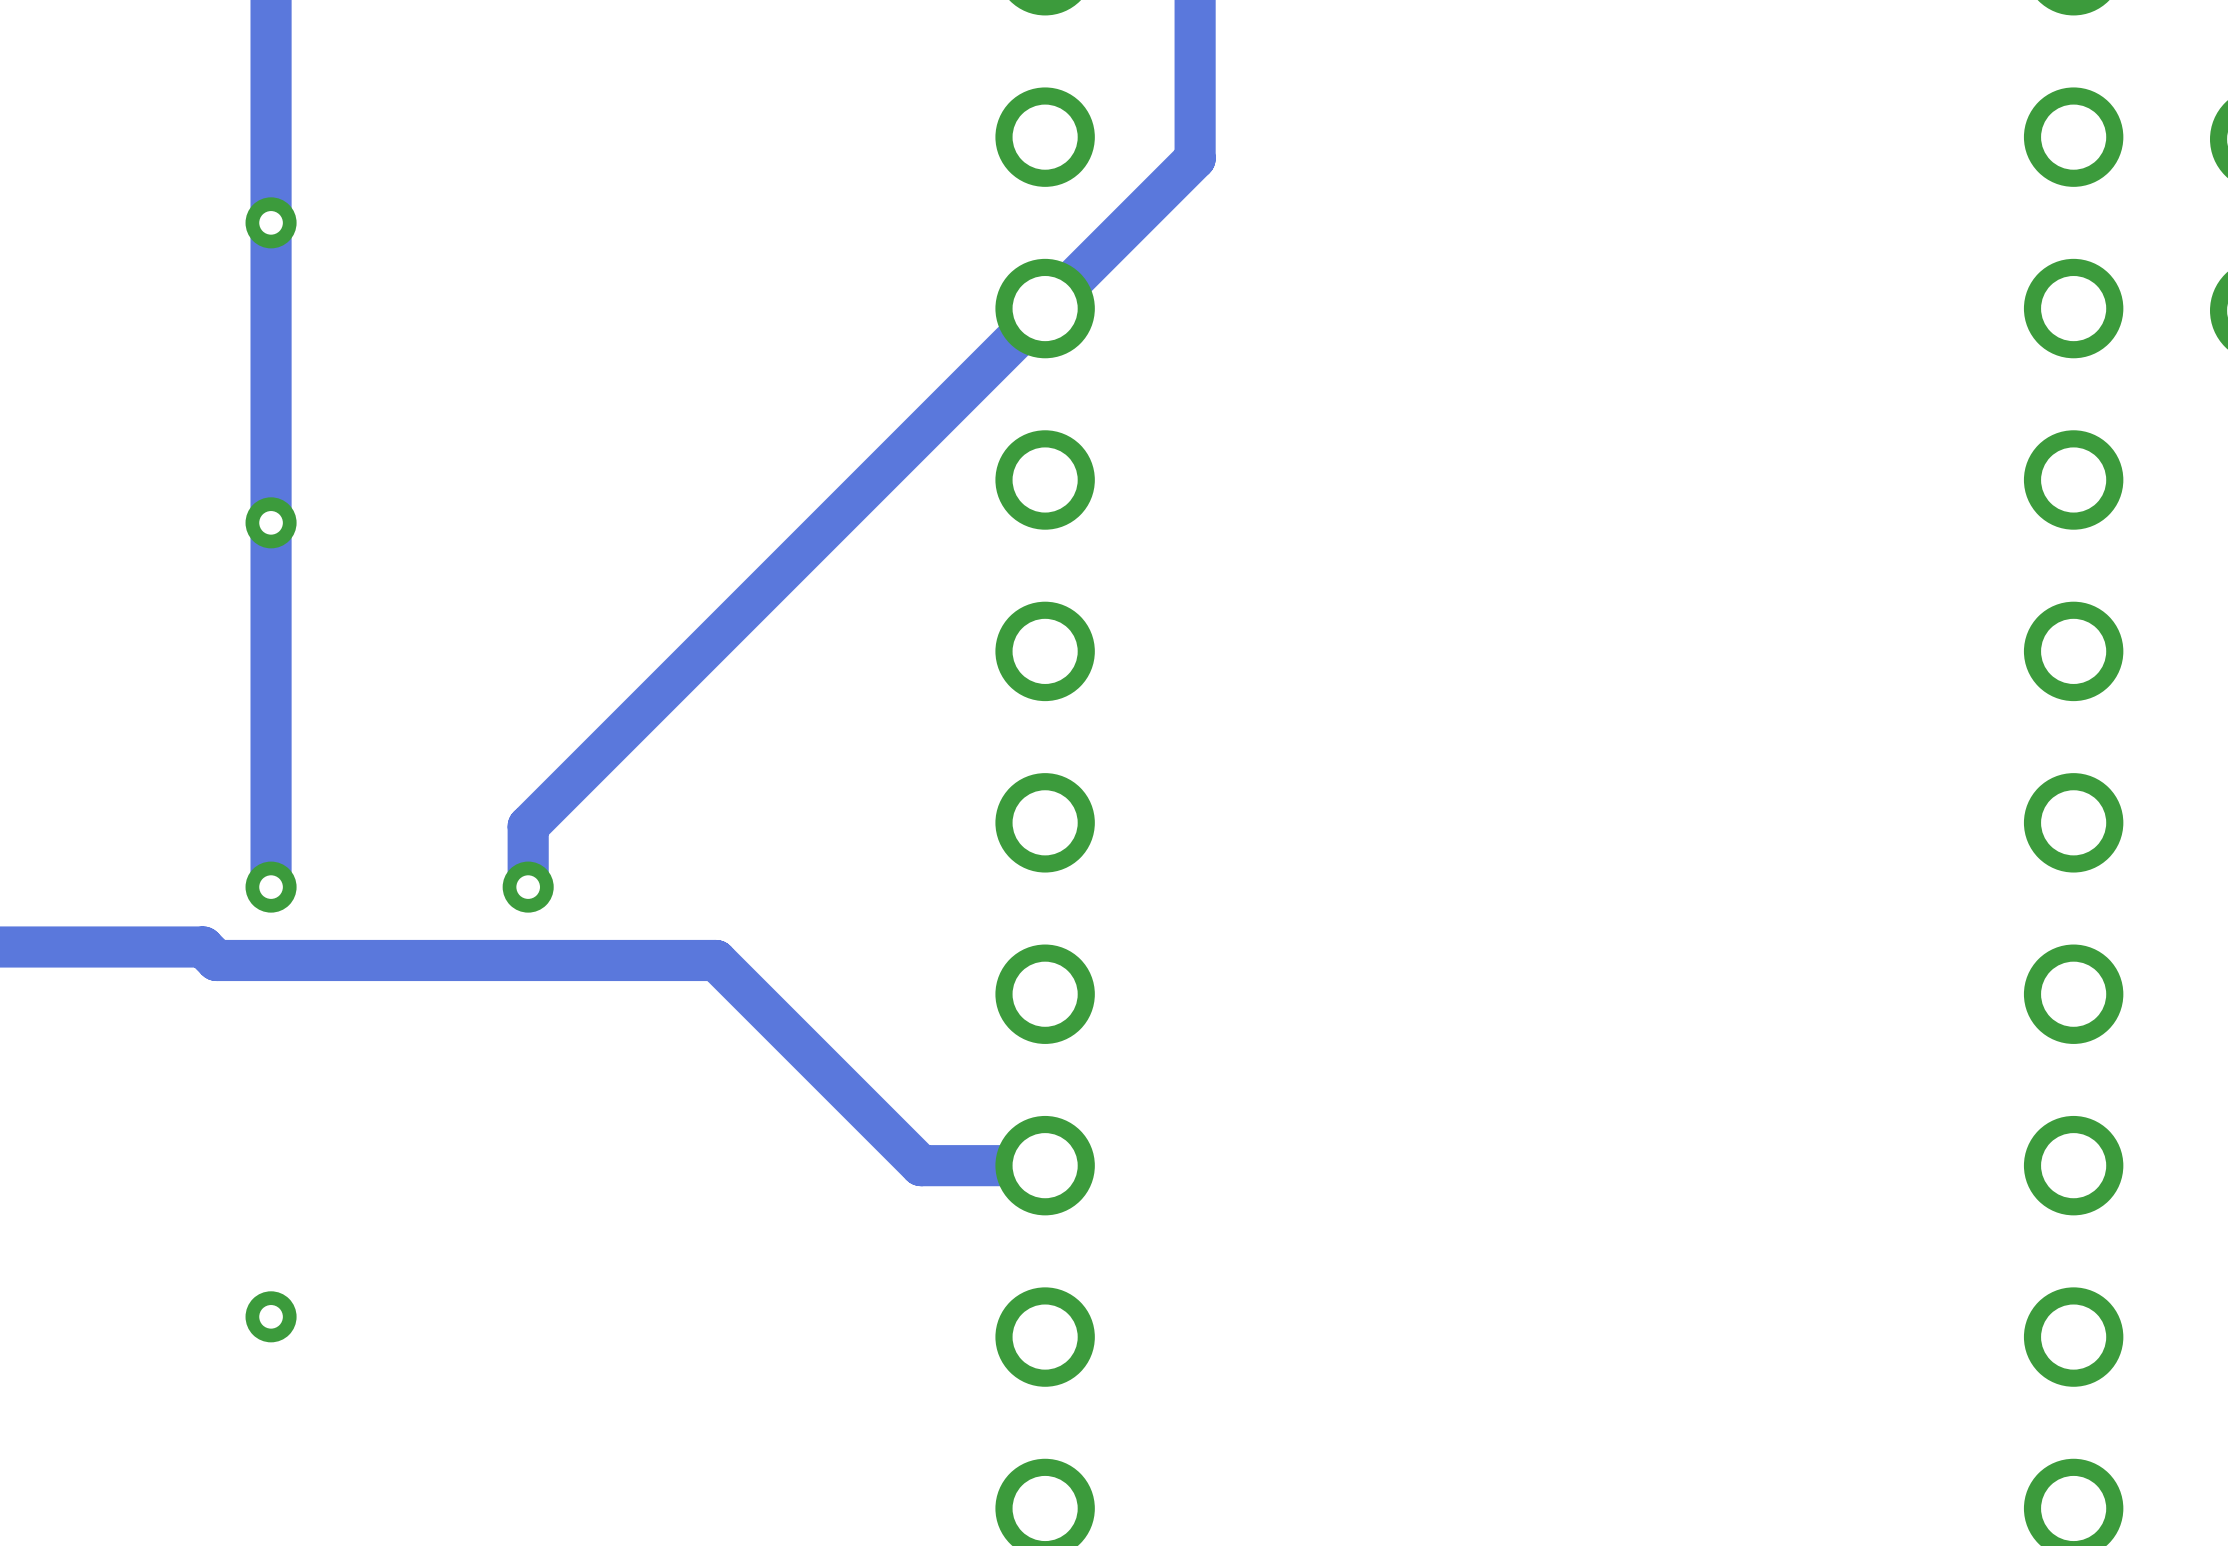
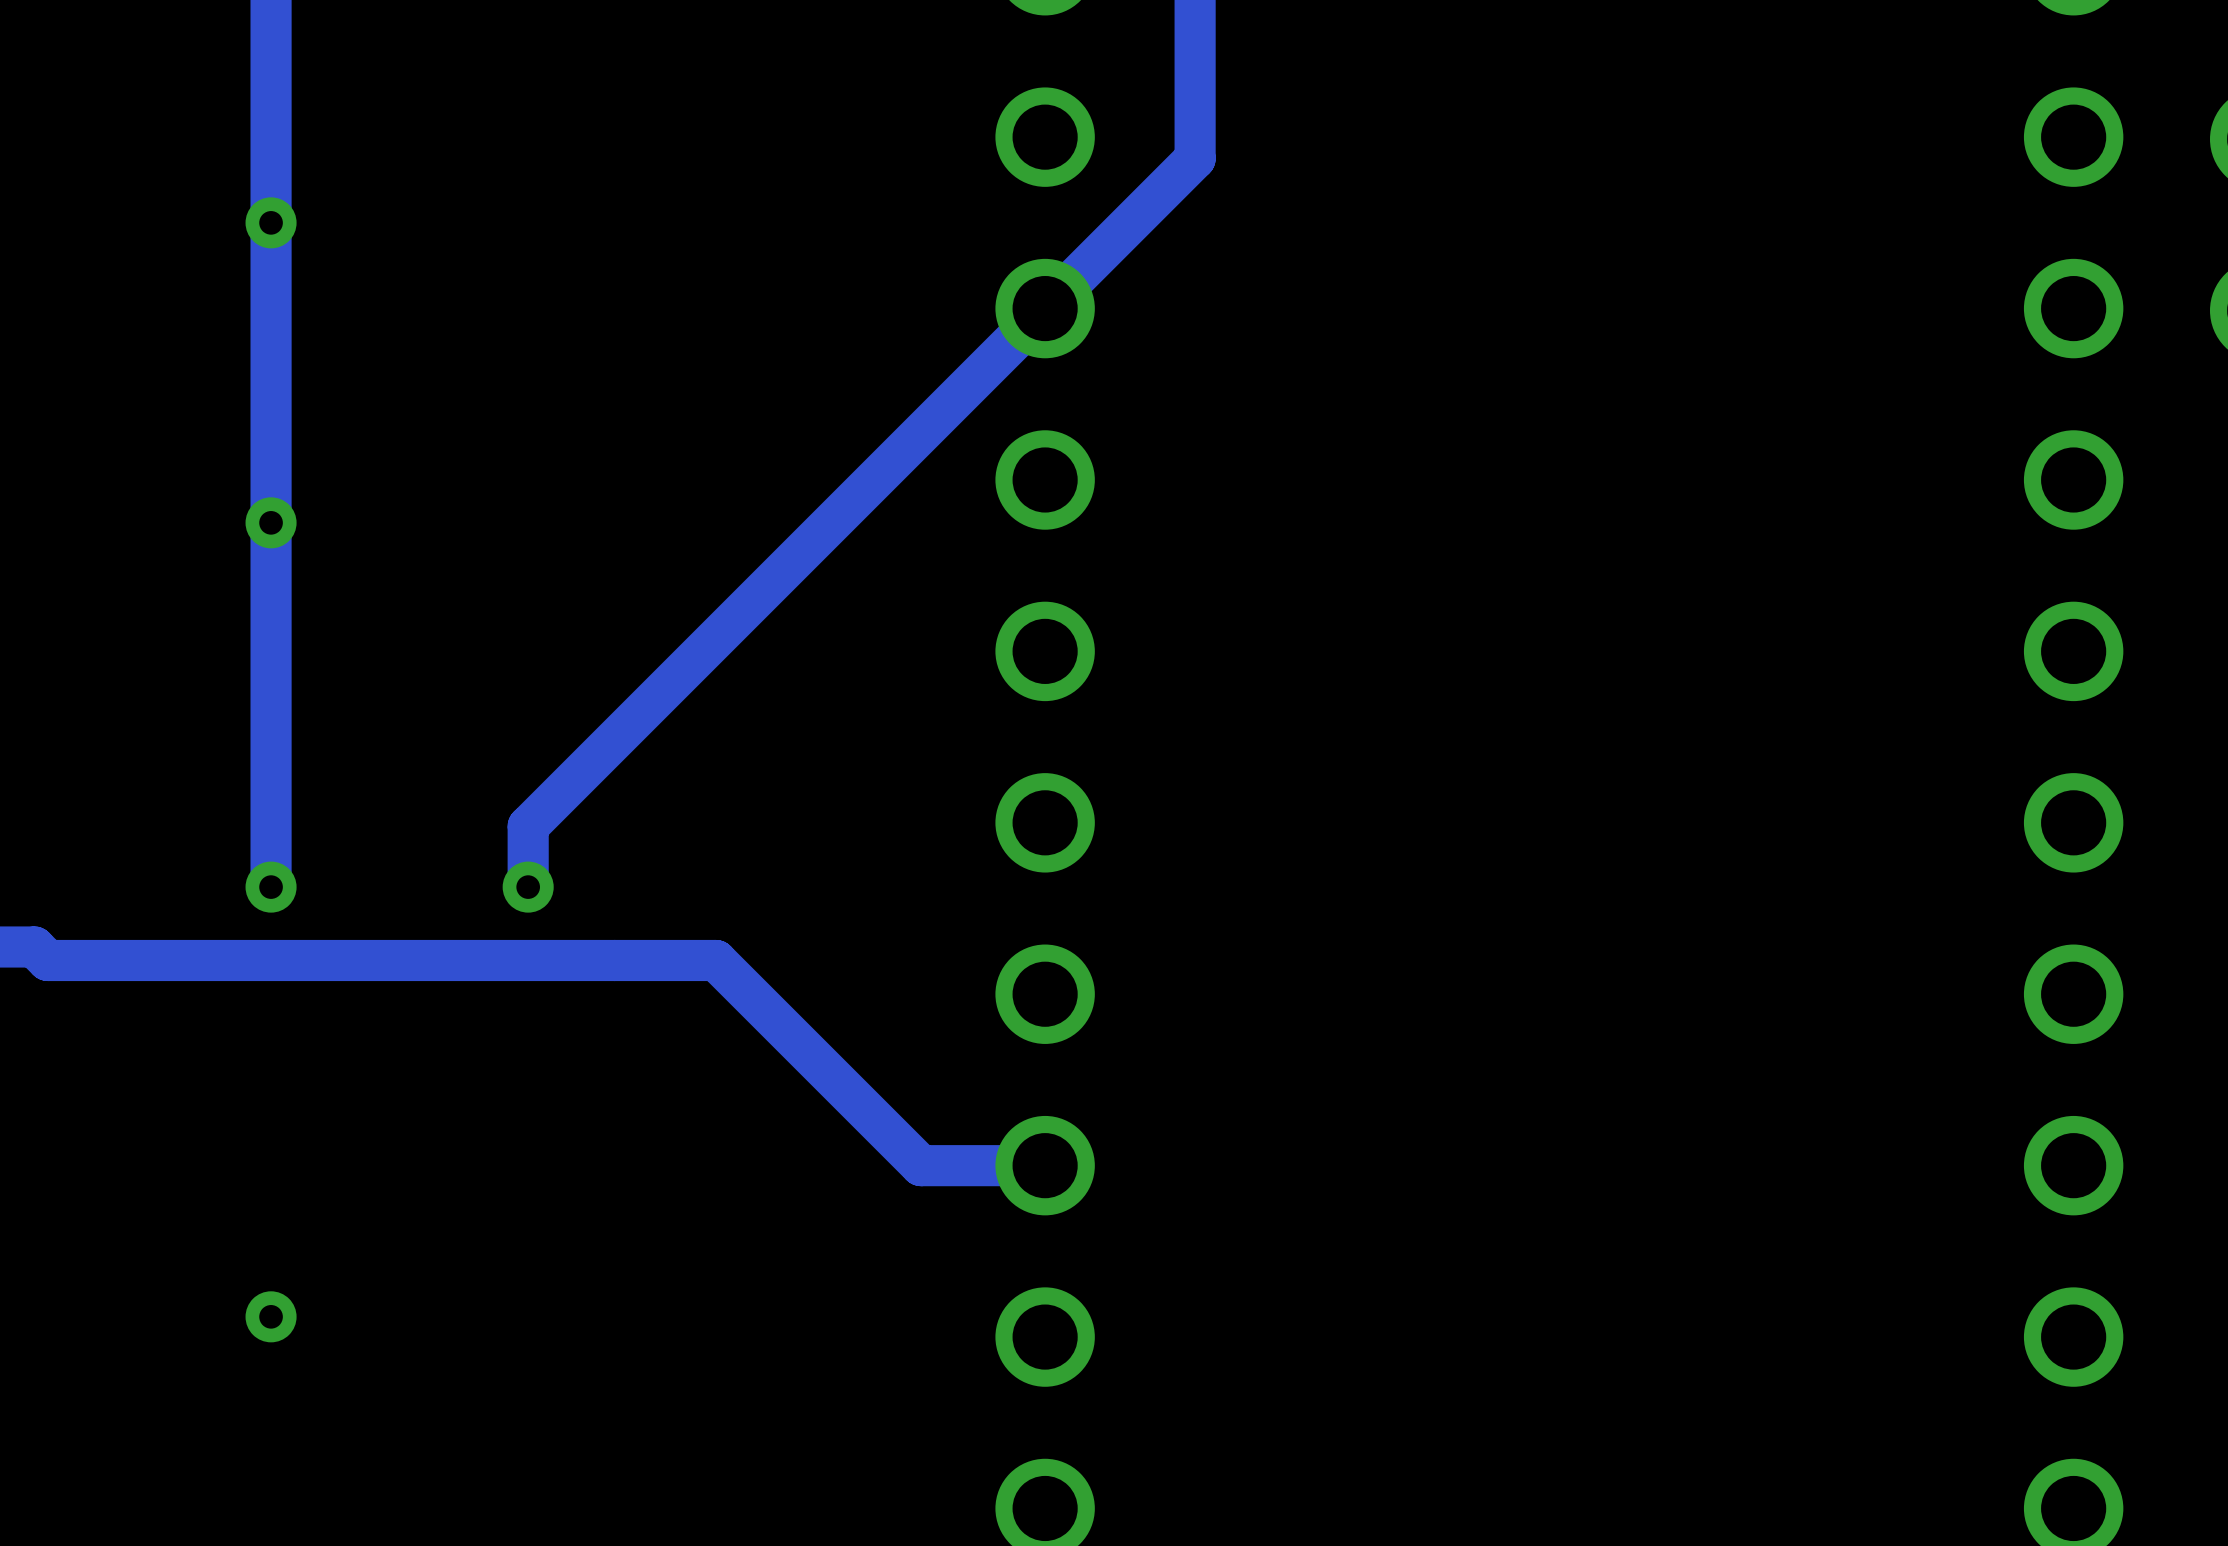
track: (34, 947) (203, 947) (216, 960) -> (34, 947) (47, 960) (216, 960)

